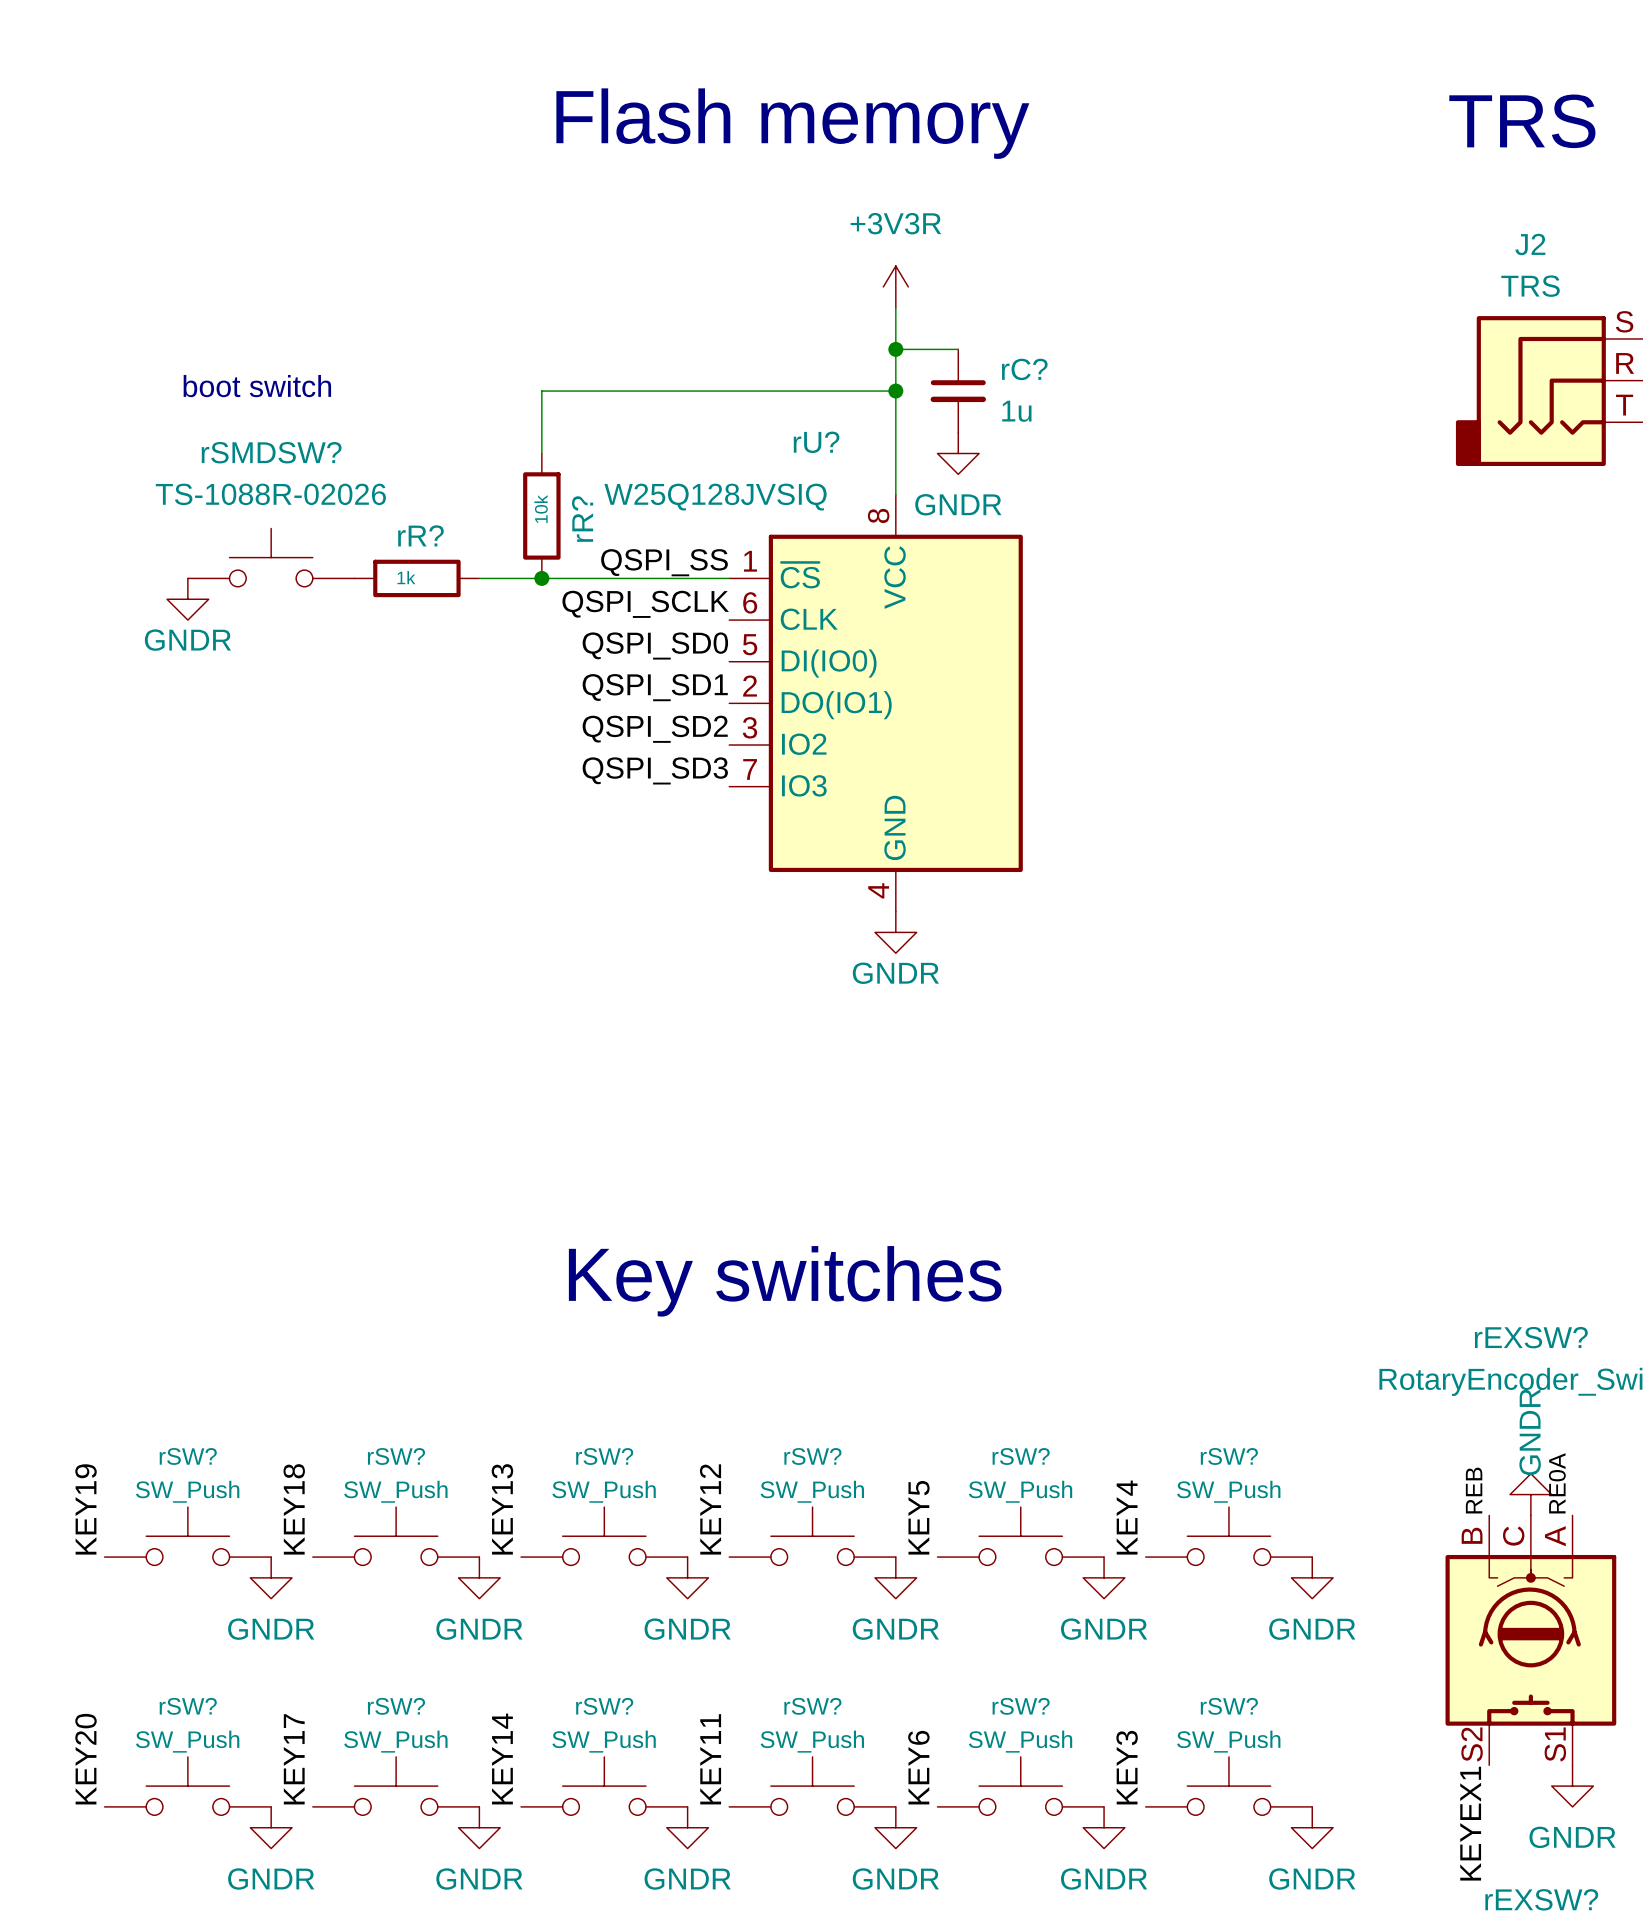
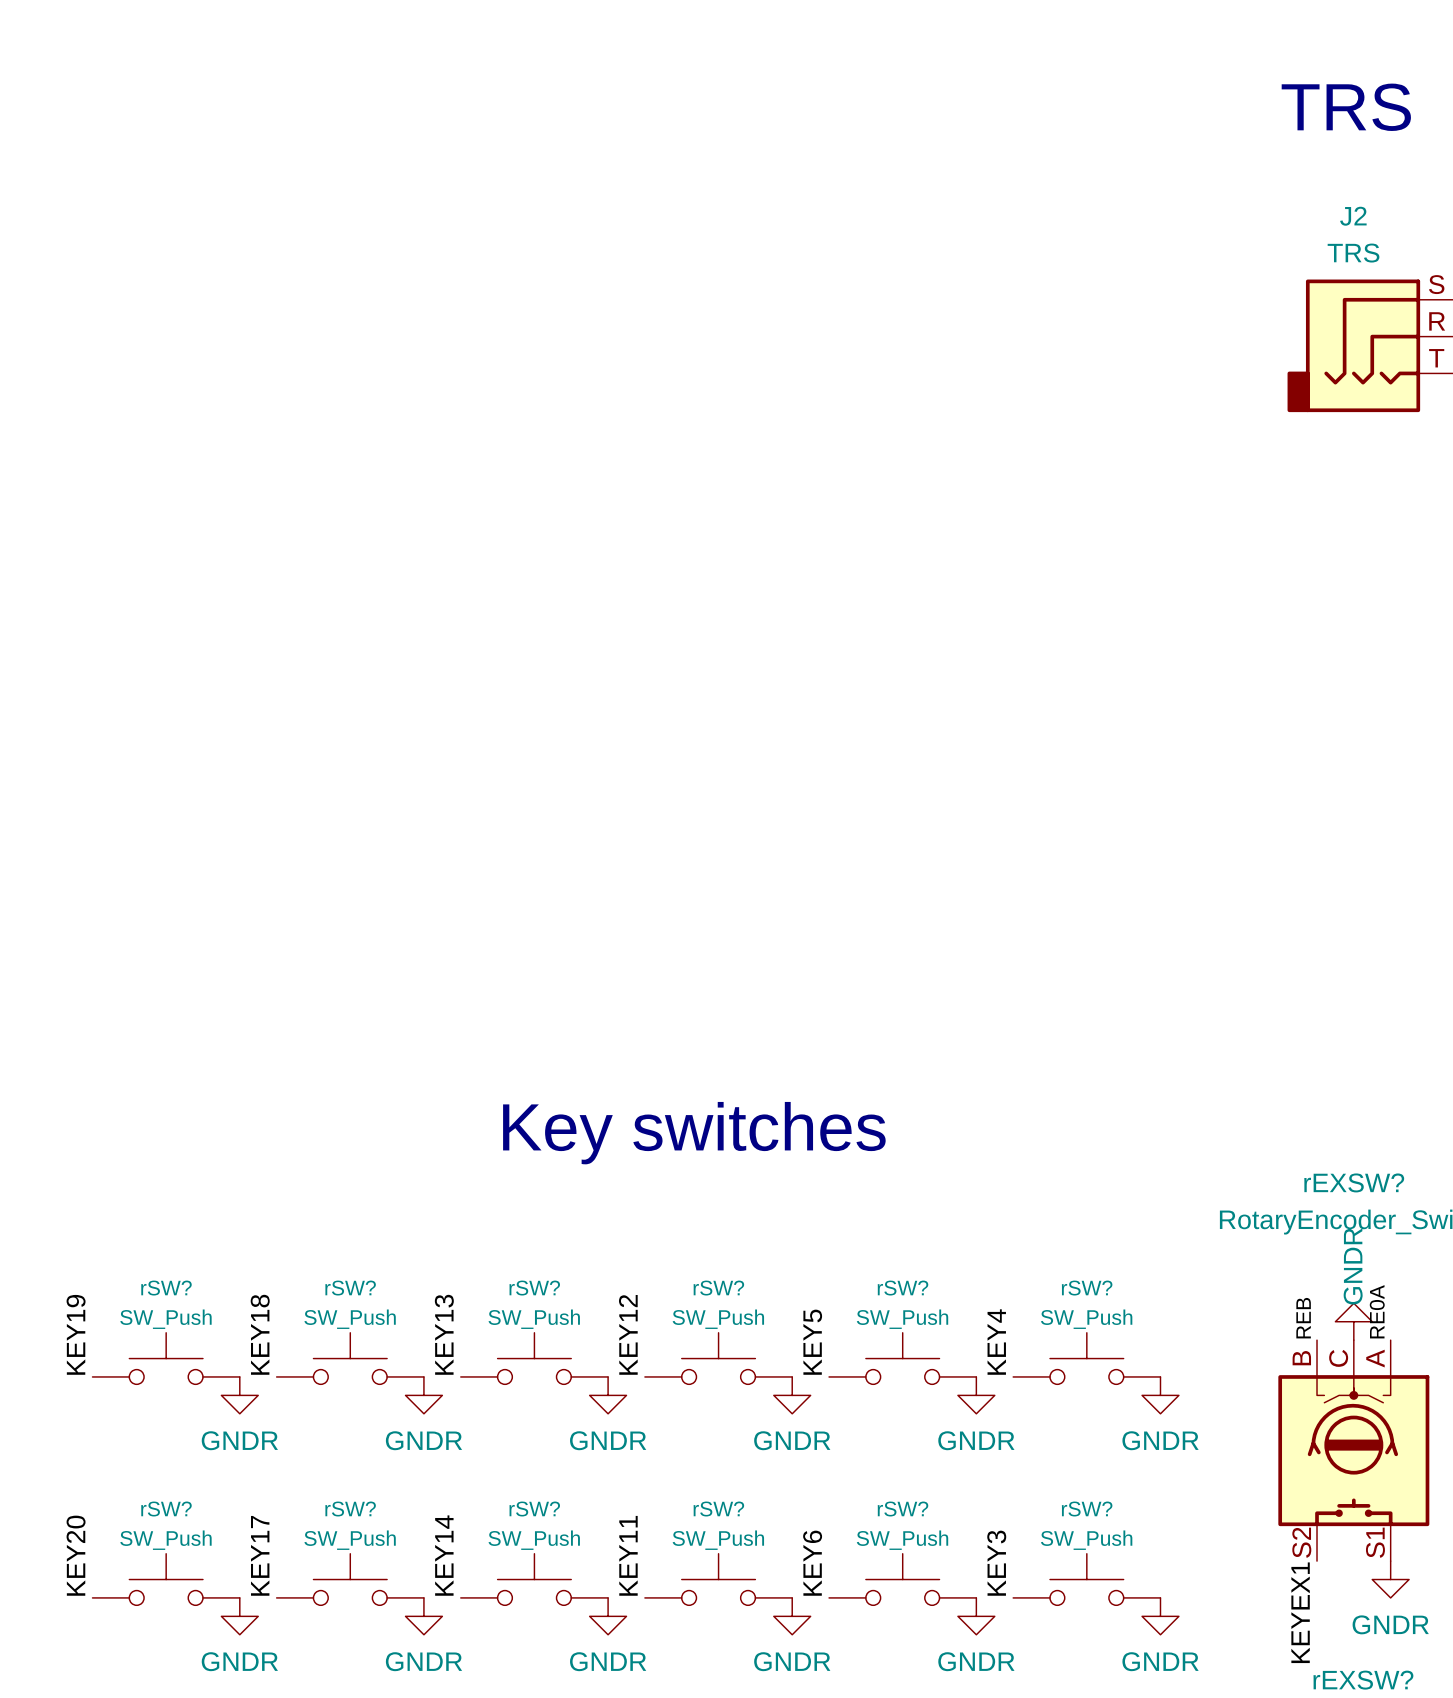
text: Flash memory (792, 123) -> none
power symbol: +3V3R (895, 286) -> none
wire: (895, 307) (895, 495) -> none
wire: (895, 349) (958, 349) -> none
junction: (895, 349) -> none
text: boot switch (257, 386) -> none
wire: (895, 391) (541, 391) (541, 453) -> none
junction: (895, 391) -> none
rC?: 1u (958, 391) -> none
power symbol: GNDR (958, 453) -> none
rR?: 10k (541, 515) -> none
rSMDSW?: TS-1088R-02026 (271, 557) -> none
label: QSPI_SS (664, 562) -> none
rR?: 1k (416, 578) -> none
wire: (479, 578) (729, 578) -> none
junction: (541, 578) -> none
power symbol: GNDR (187, 599) -> none
label: QSPI_SCLK (645, 604) -> none
label: QSPI_SD0 (655, 645) -> none
label: QSPI_SD1 (655, 687) -> none
rU?: W25Q128JVSIQ (876, 703) -> none
label: QSPI_SD2 (655, 729) -> none
label: QSPI_SD3 (655, 770) -> none
power symbol: GNDR (895, 932) -> none

